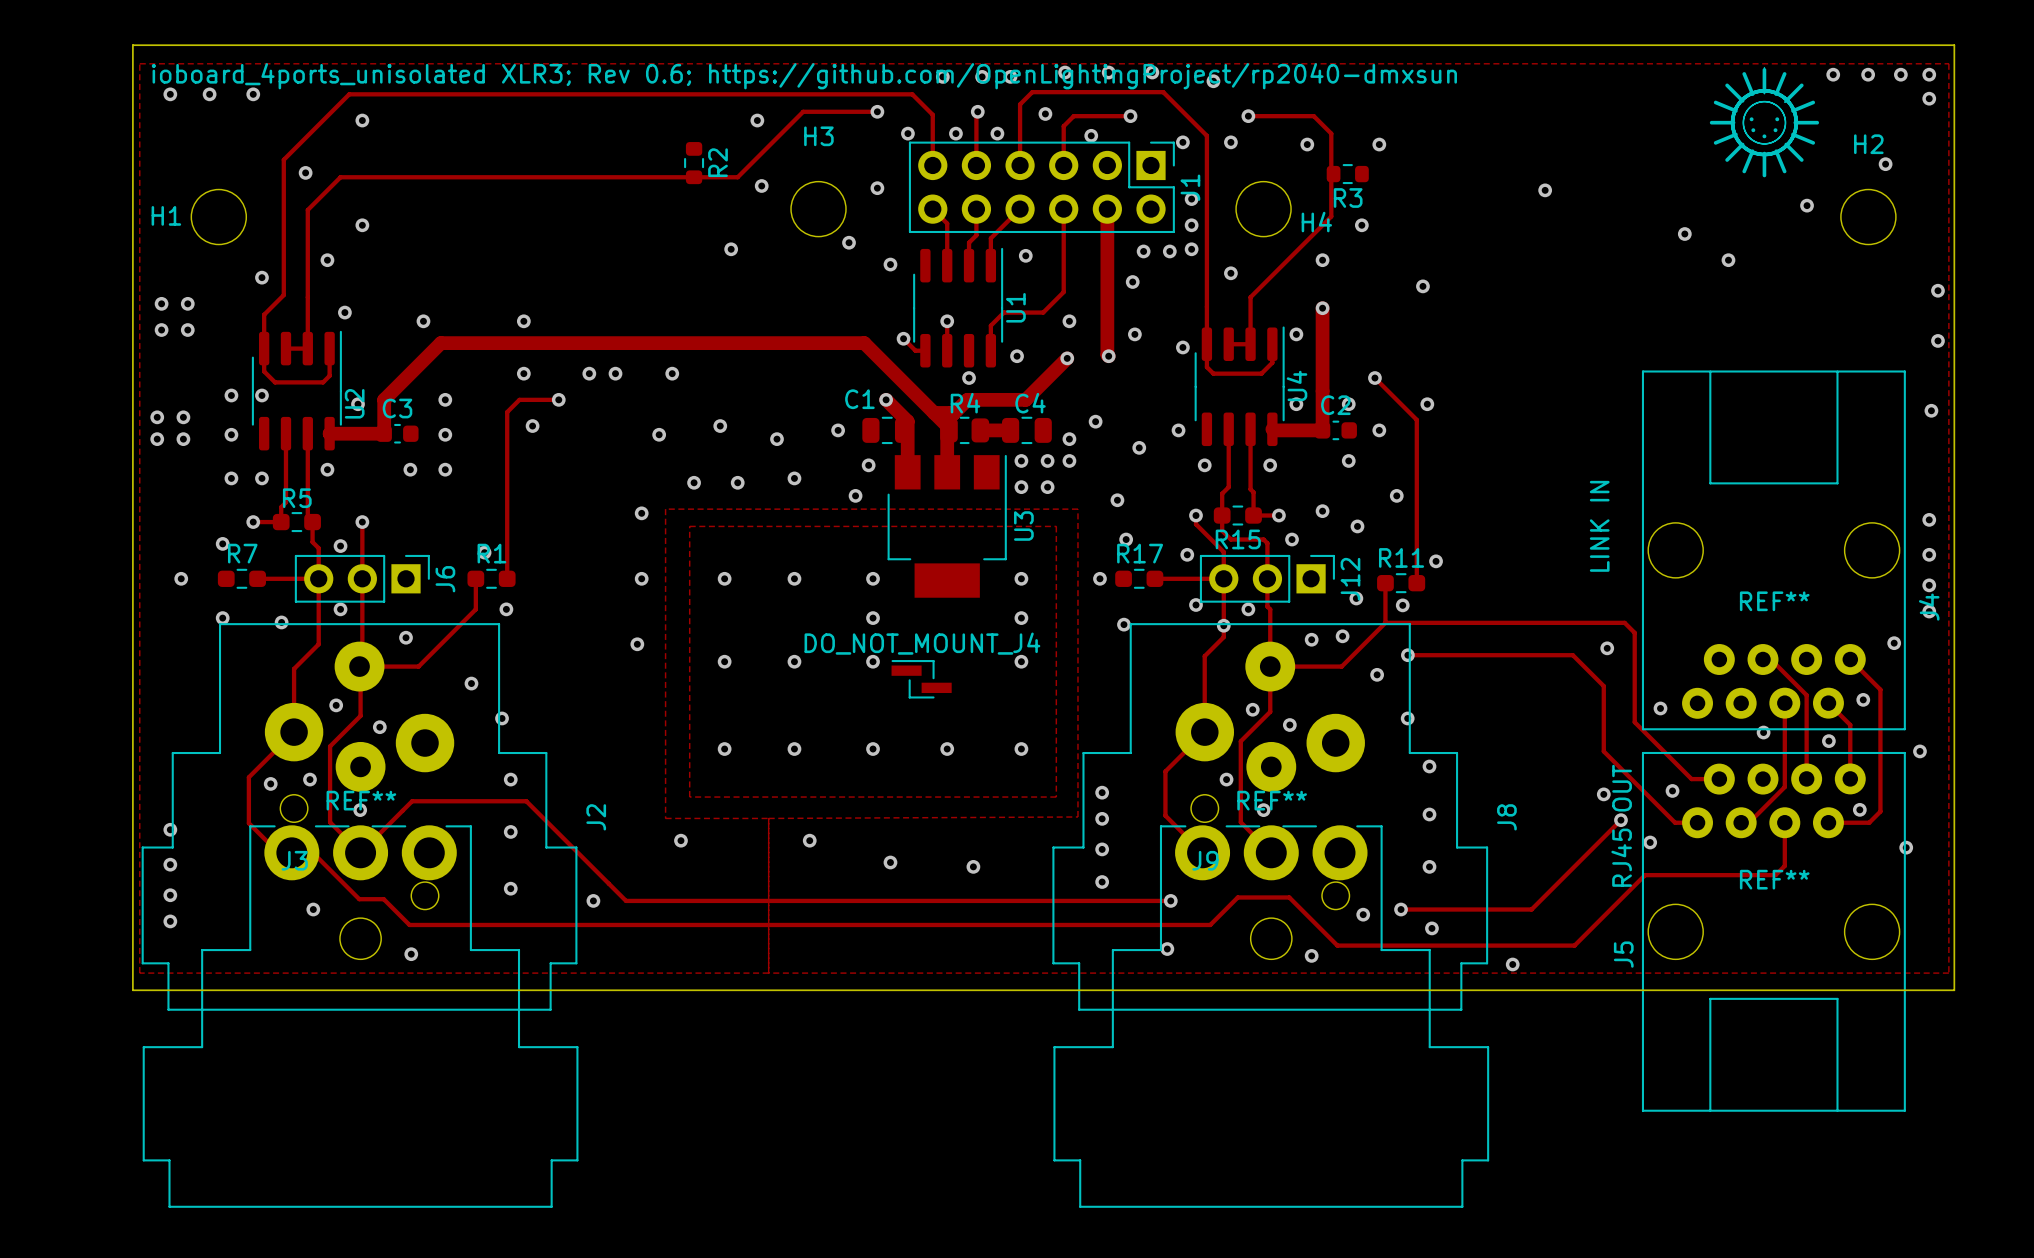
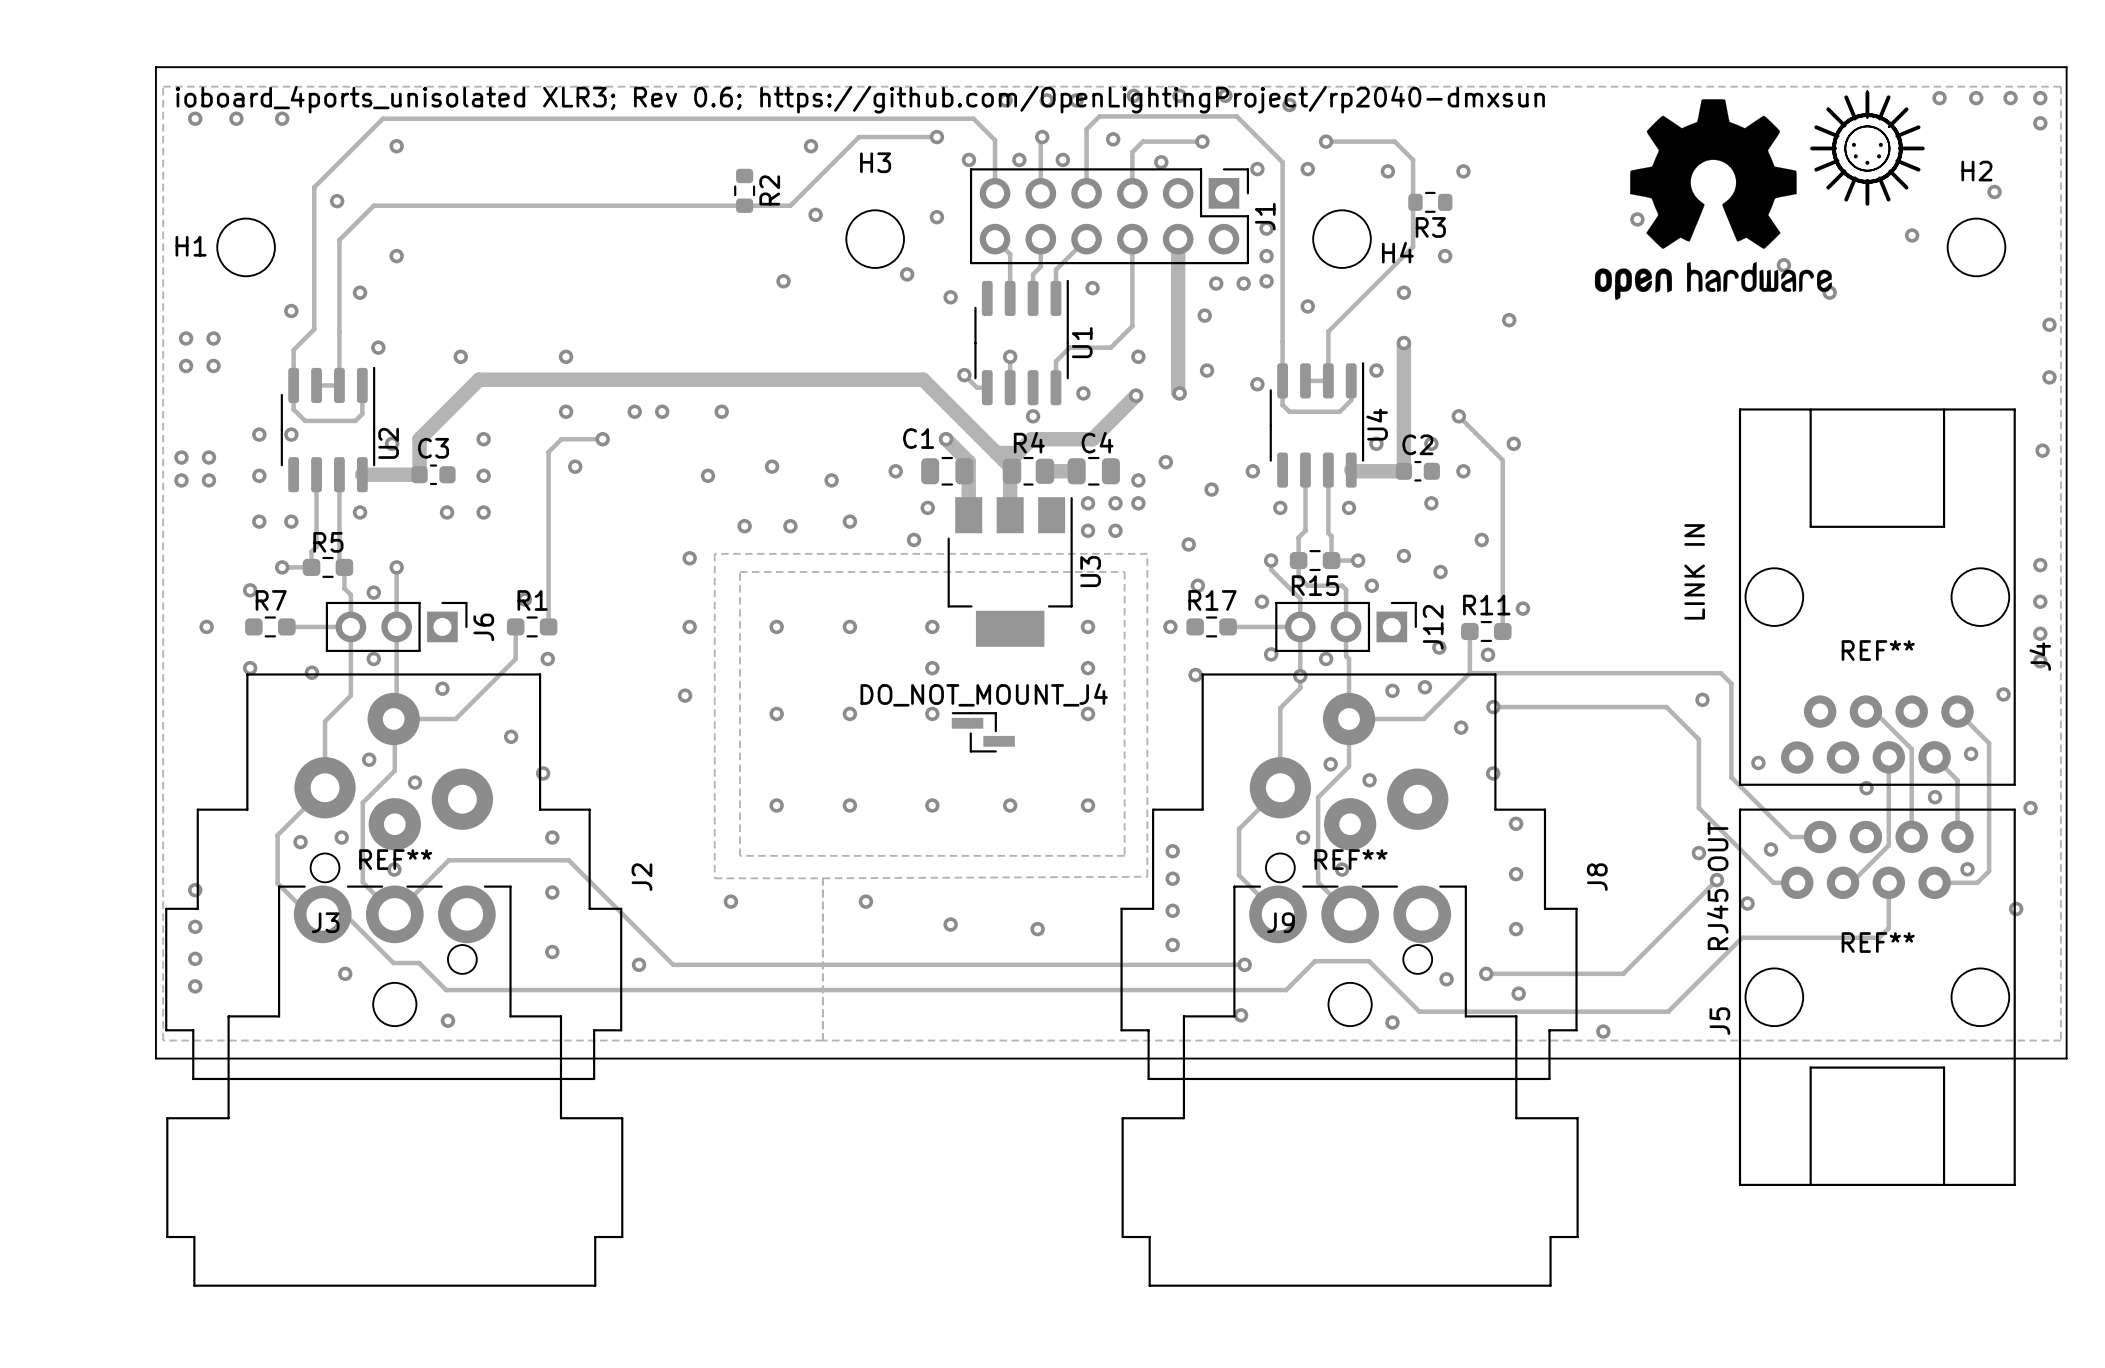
drawing: none -> [1594, 99, 1832, 300]

